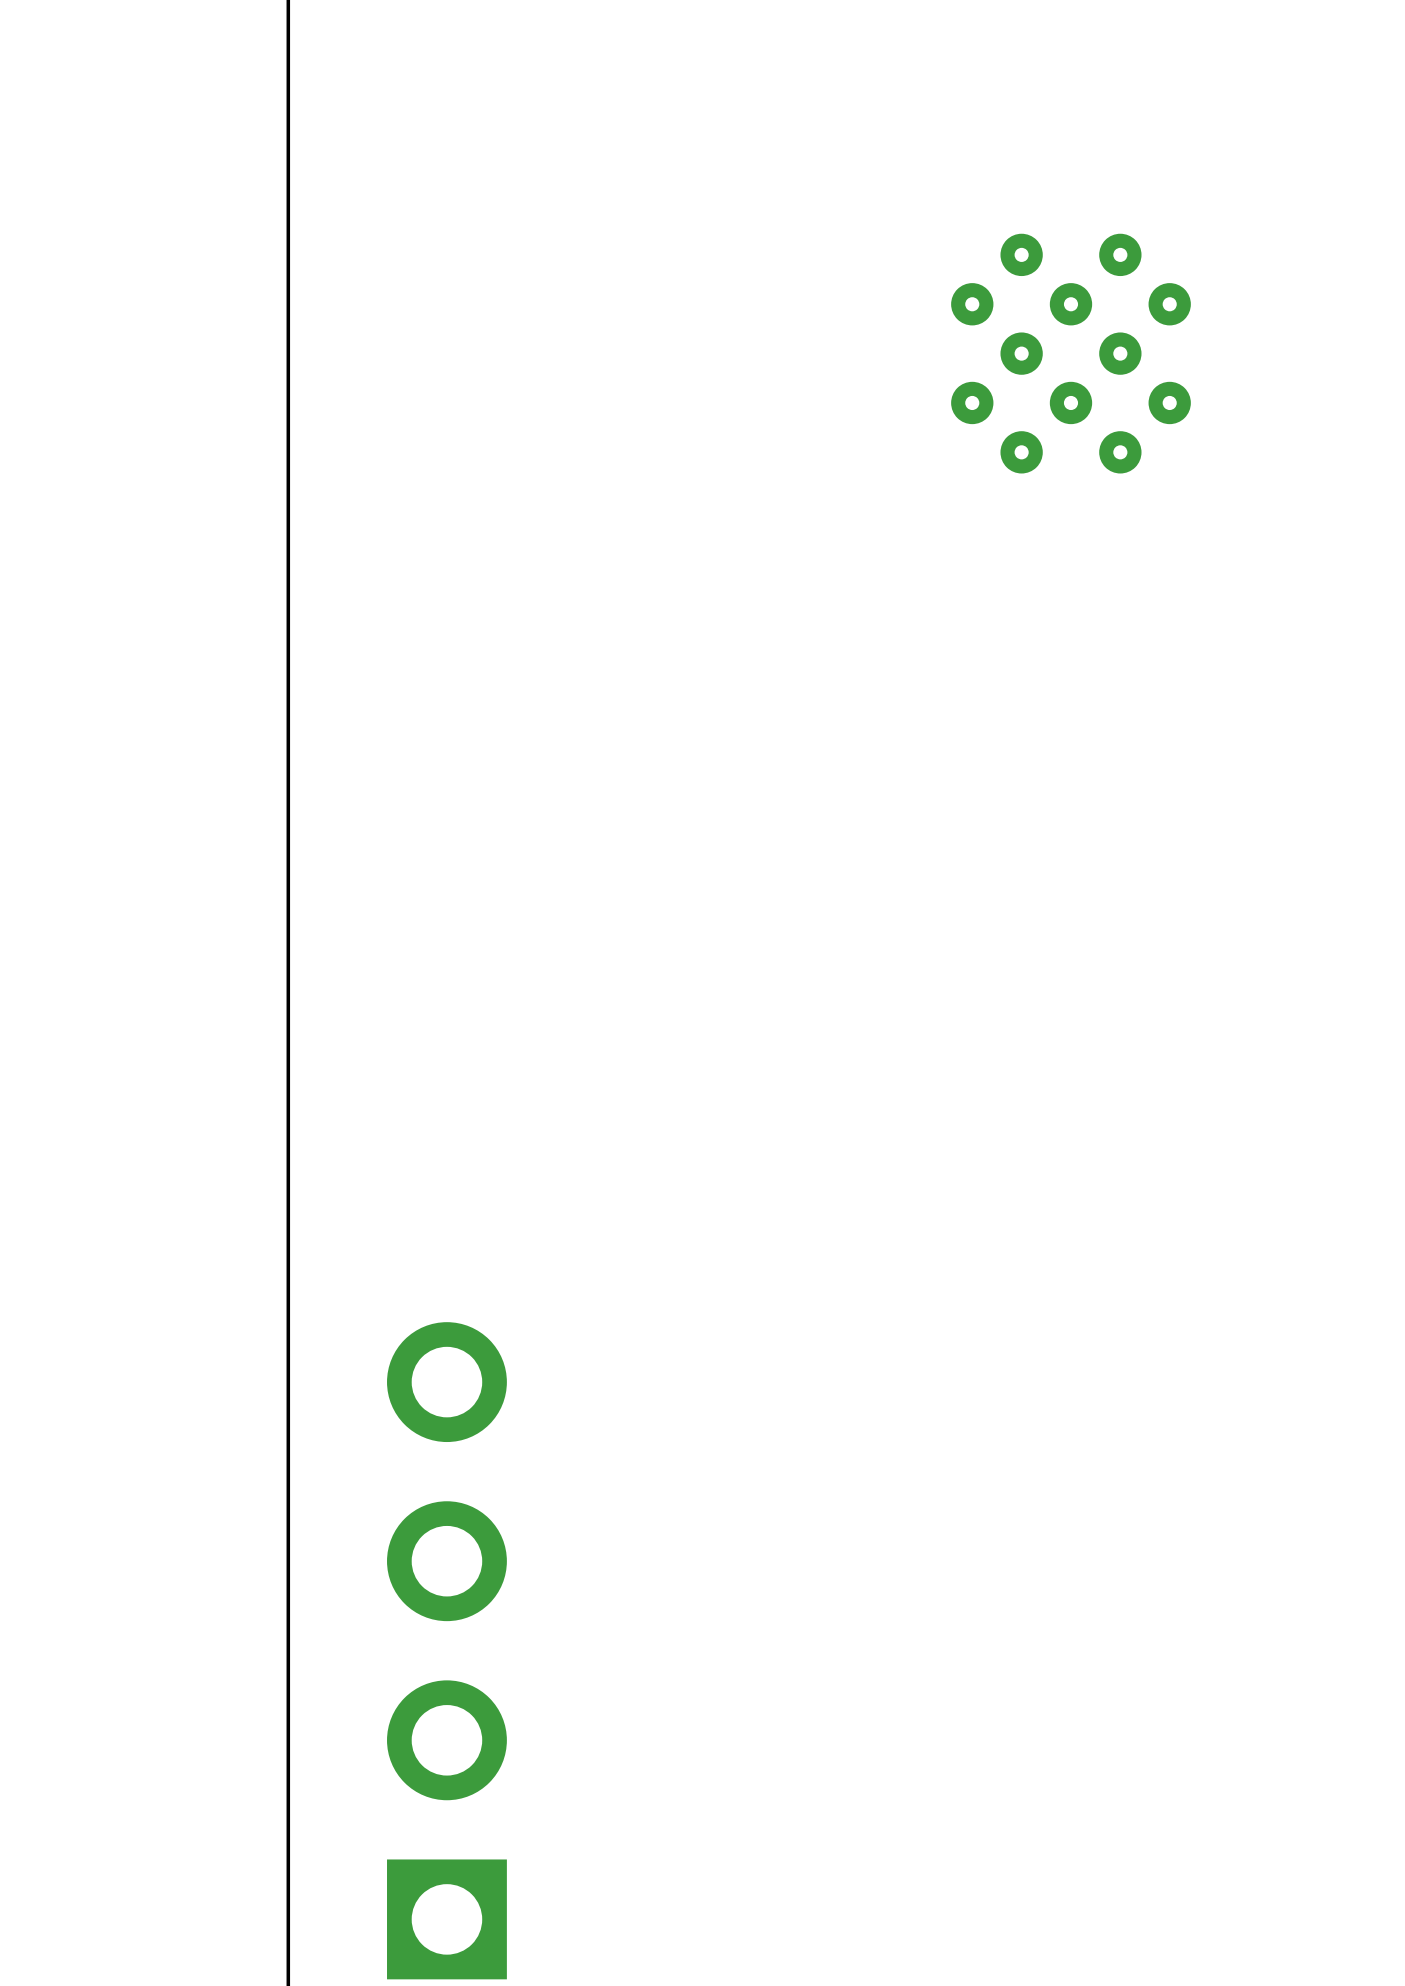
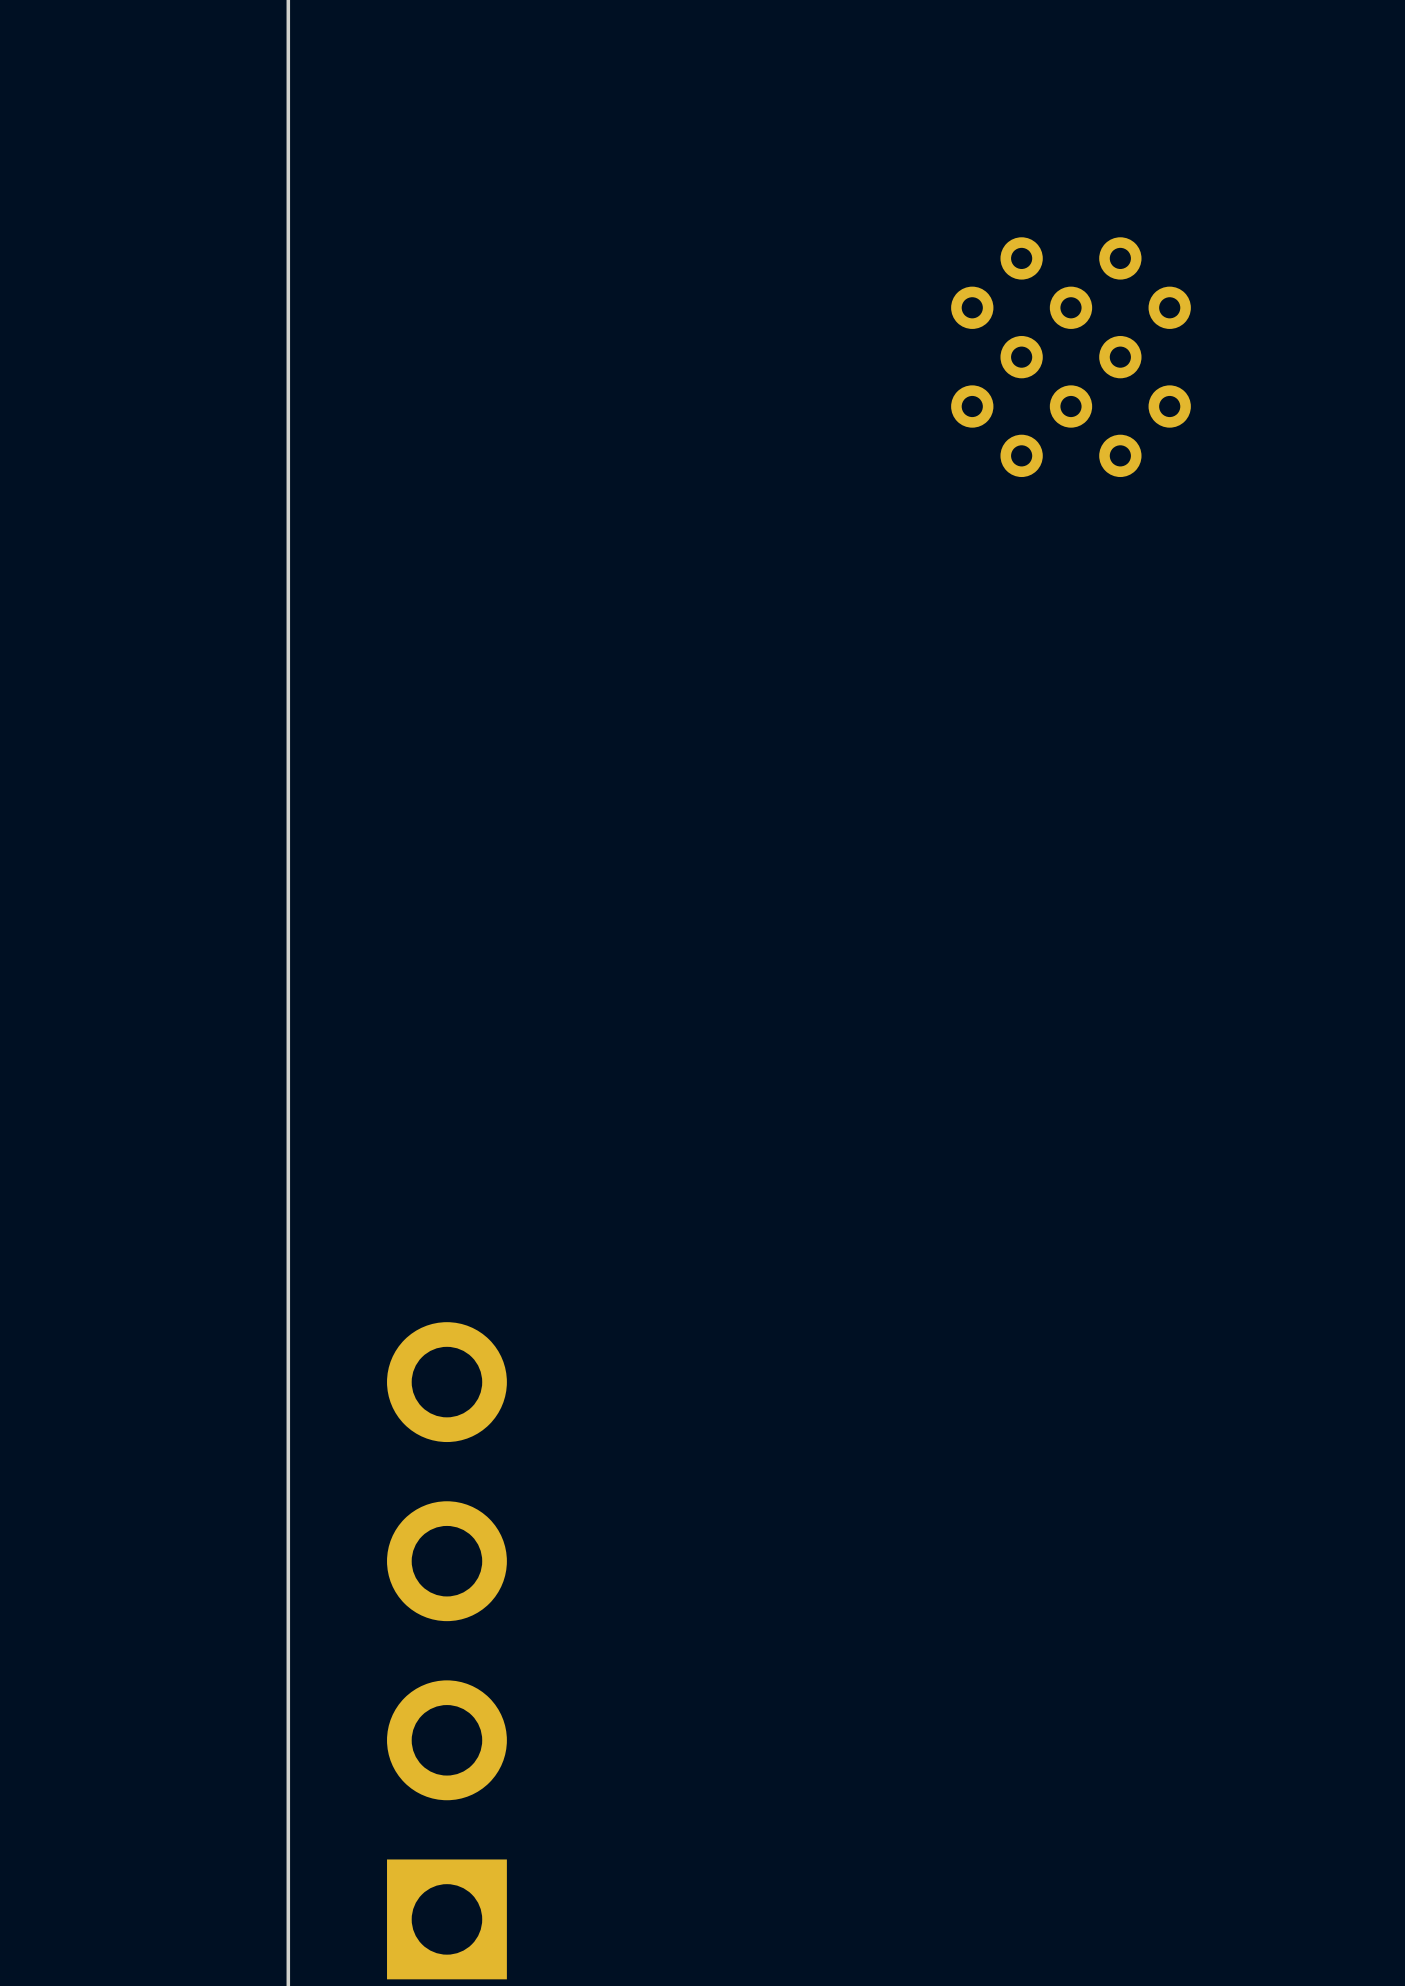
part footprint: [951, 233, 1191, 474] -> [951, 237, 1191, 478]

